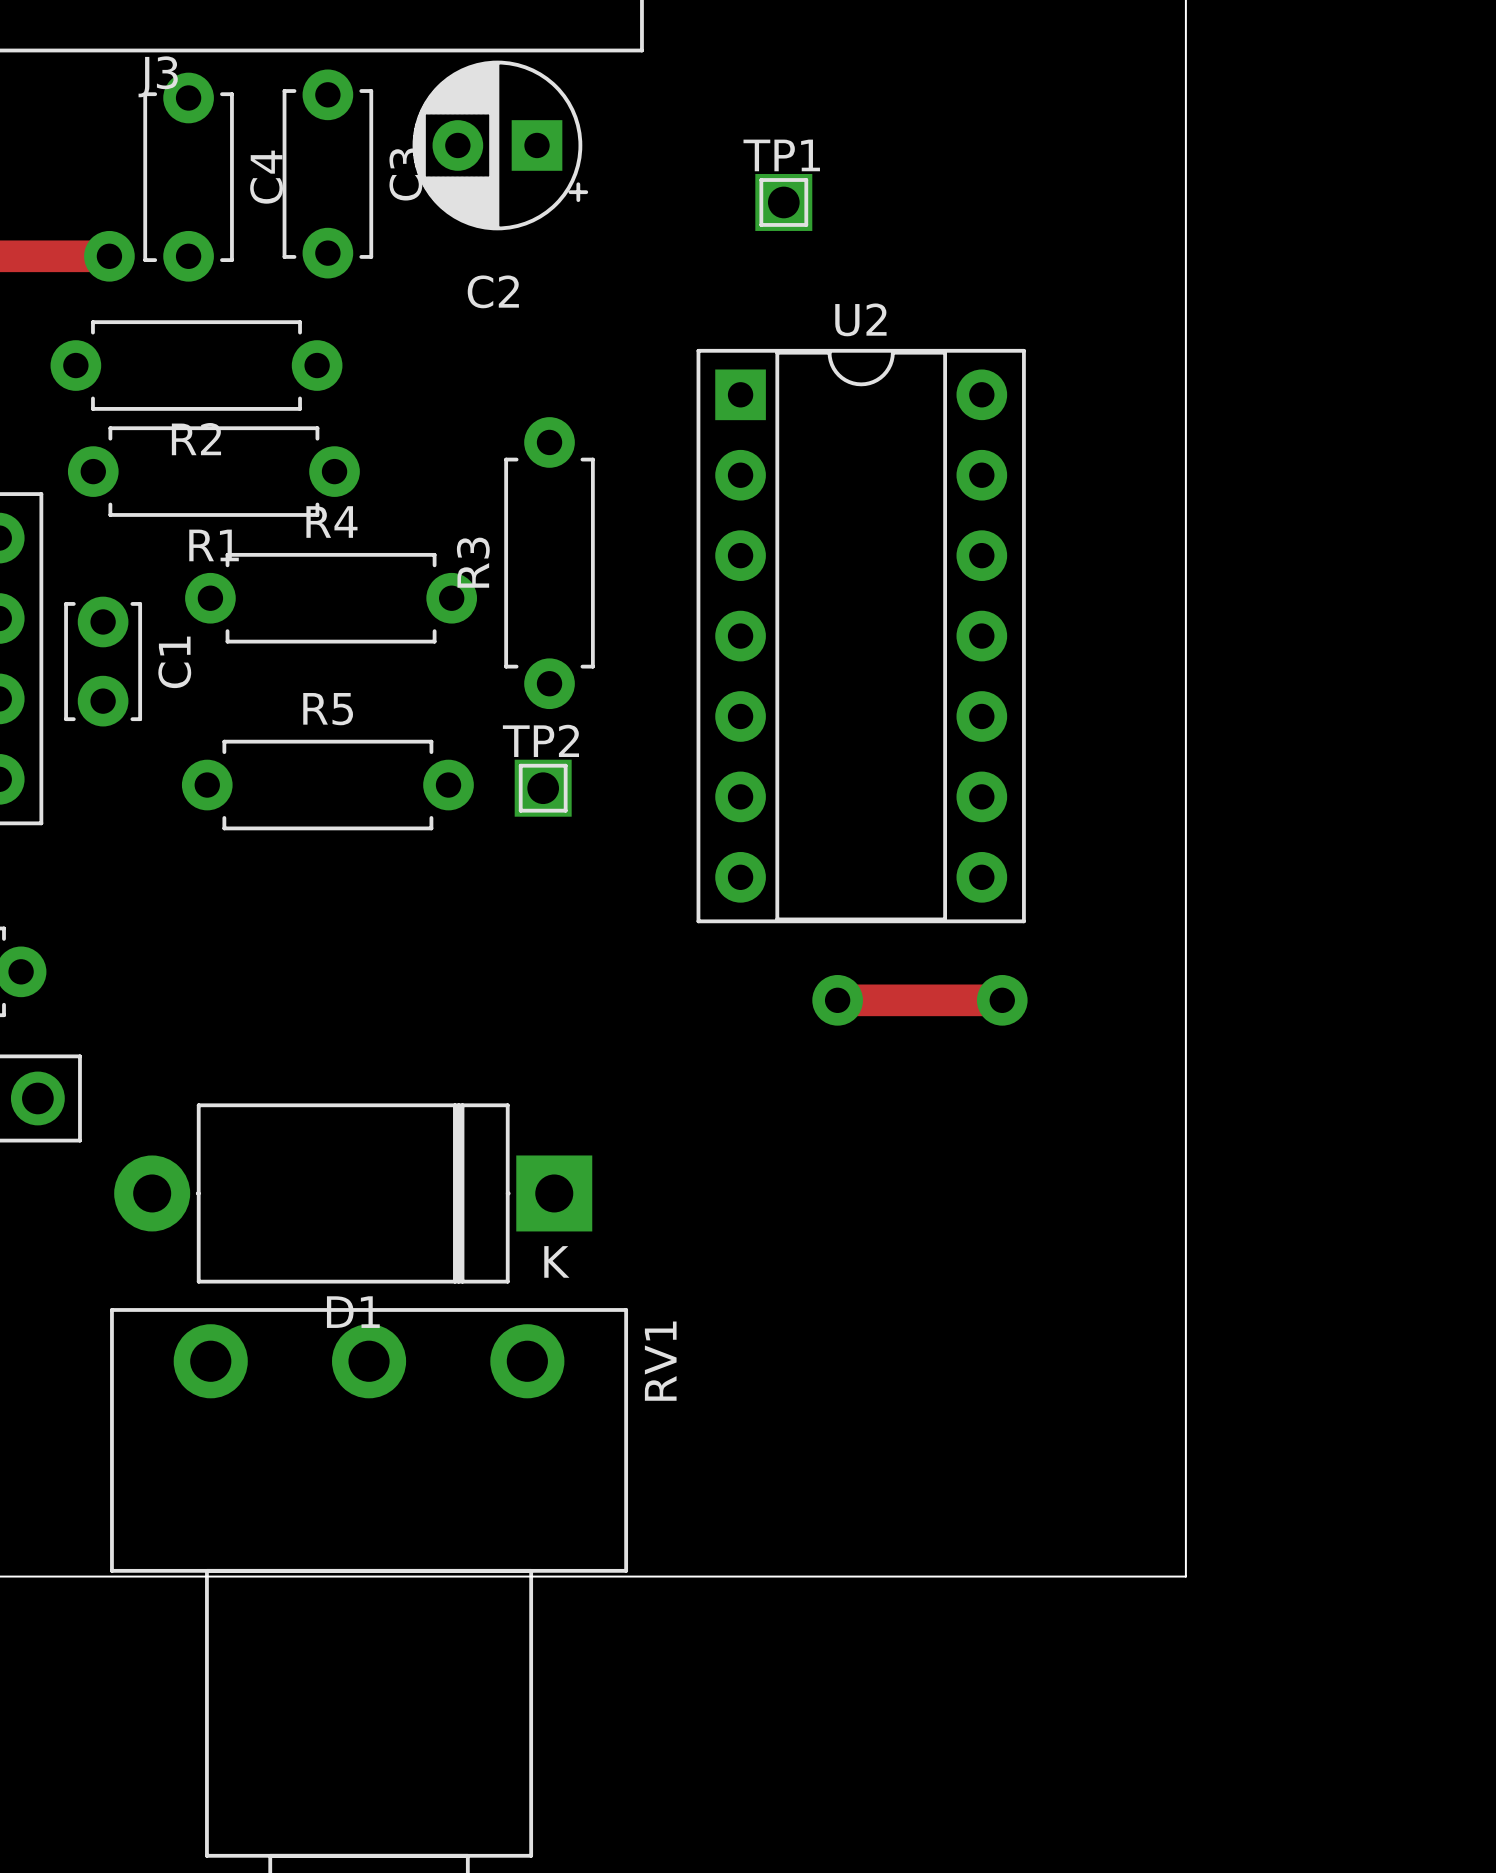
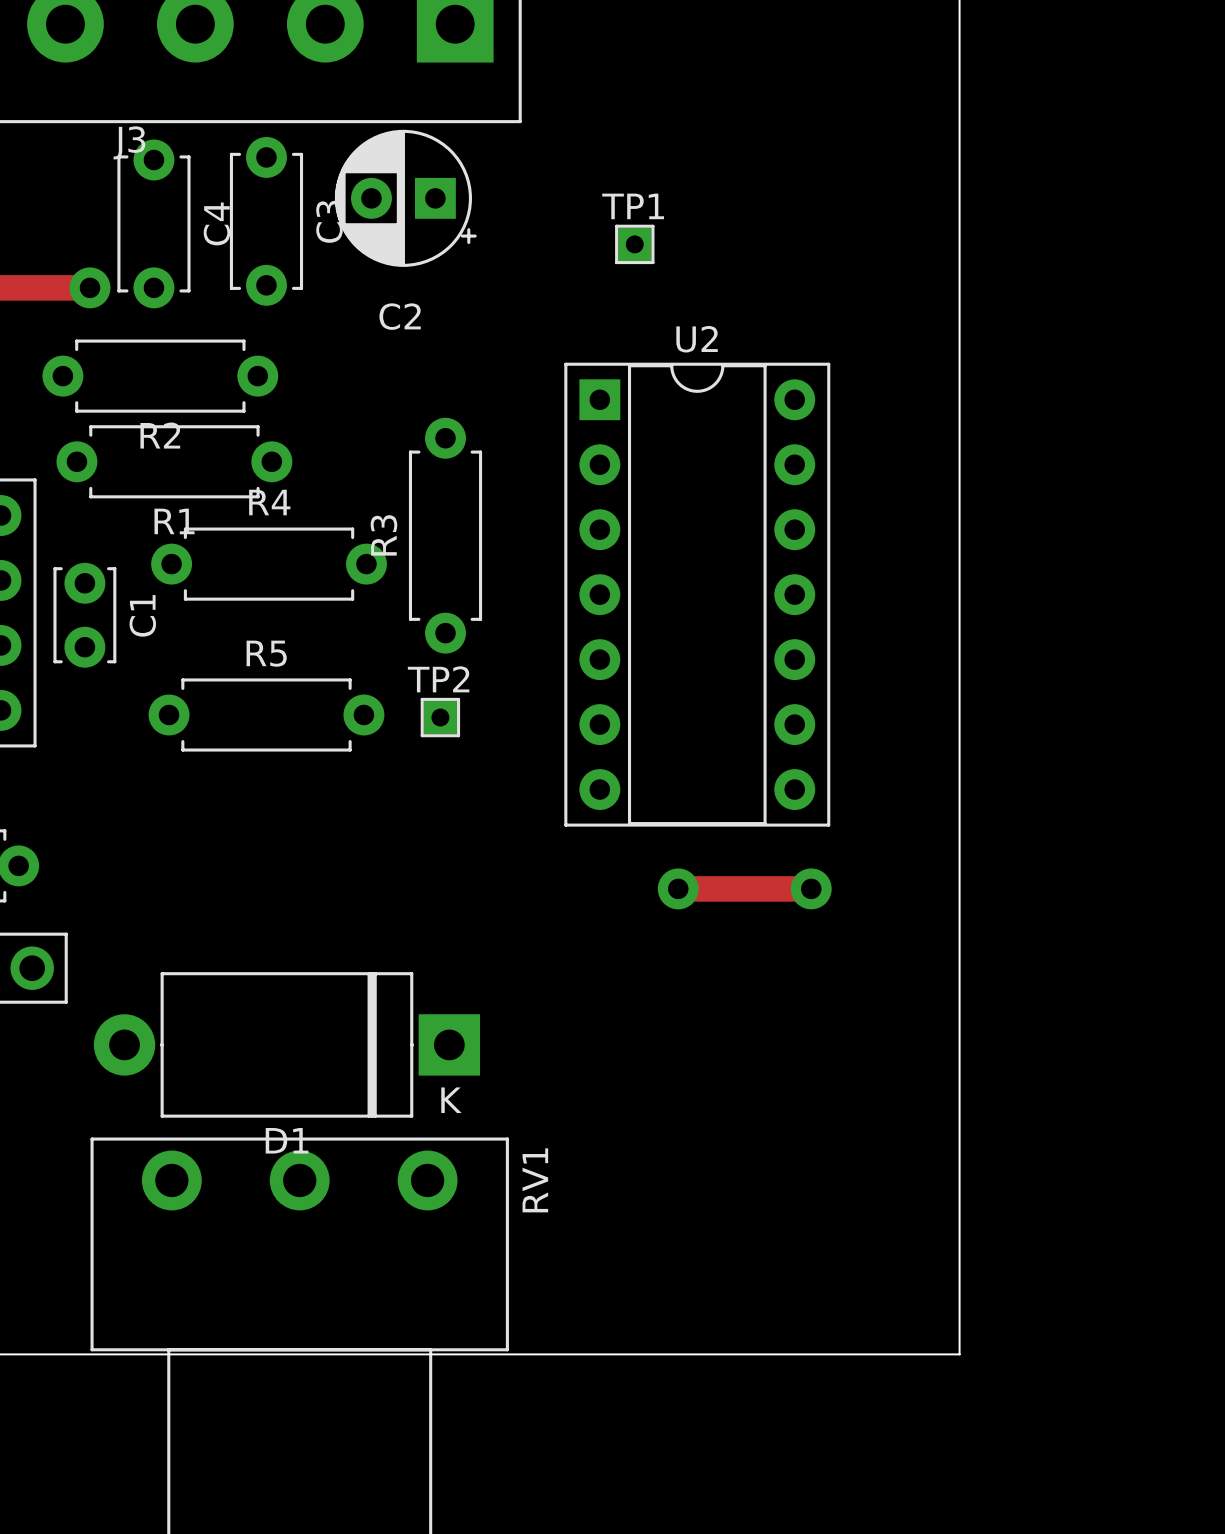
TP1 footprint: [755, 173, 813, 231] -> [615, 224, 655, 265]
TP2 footprint: [514, 759, 572, 817] -> [420, 697, 461, 738]

